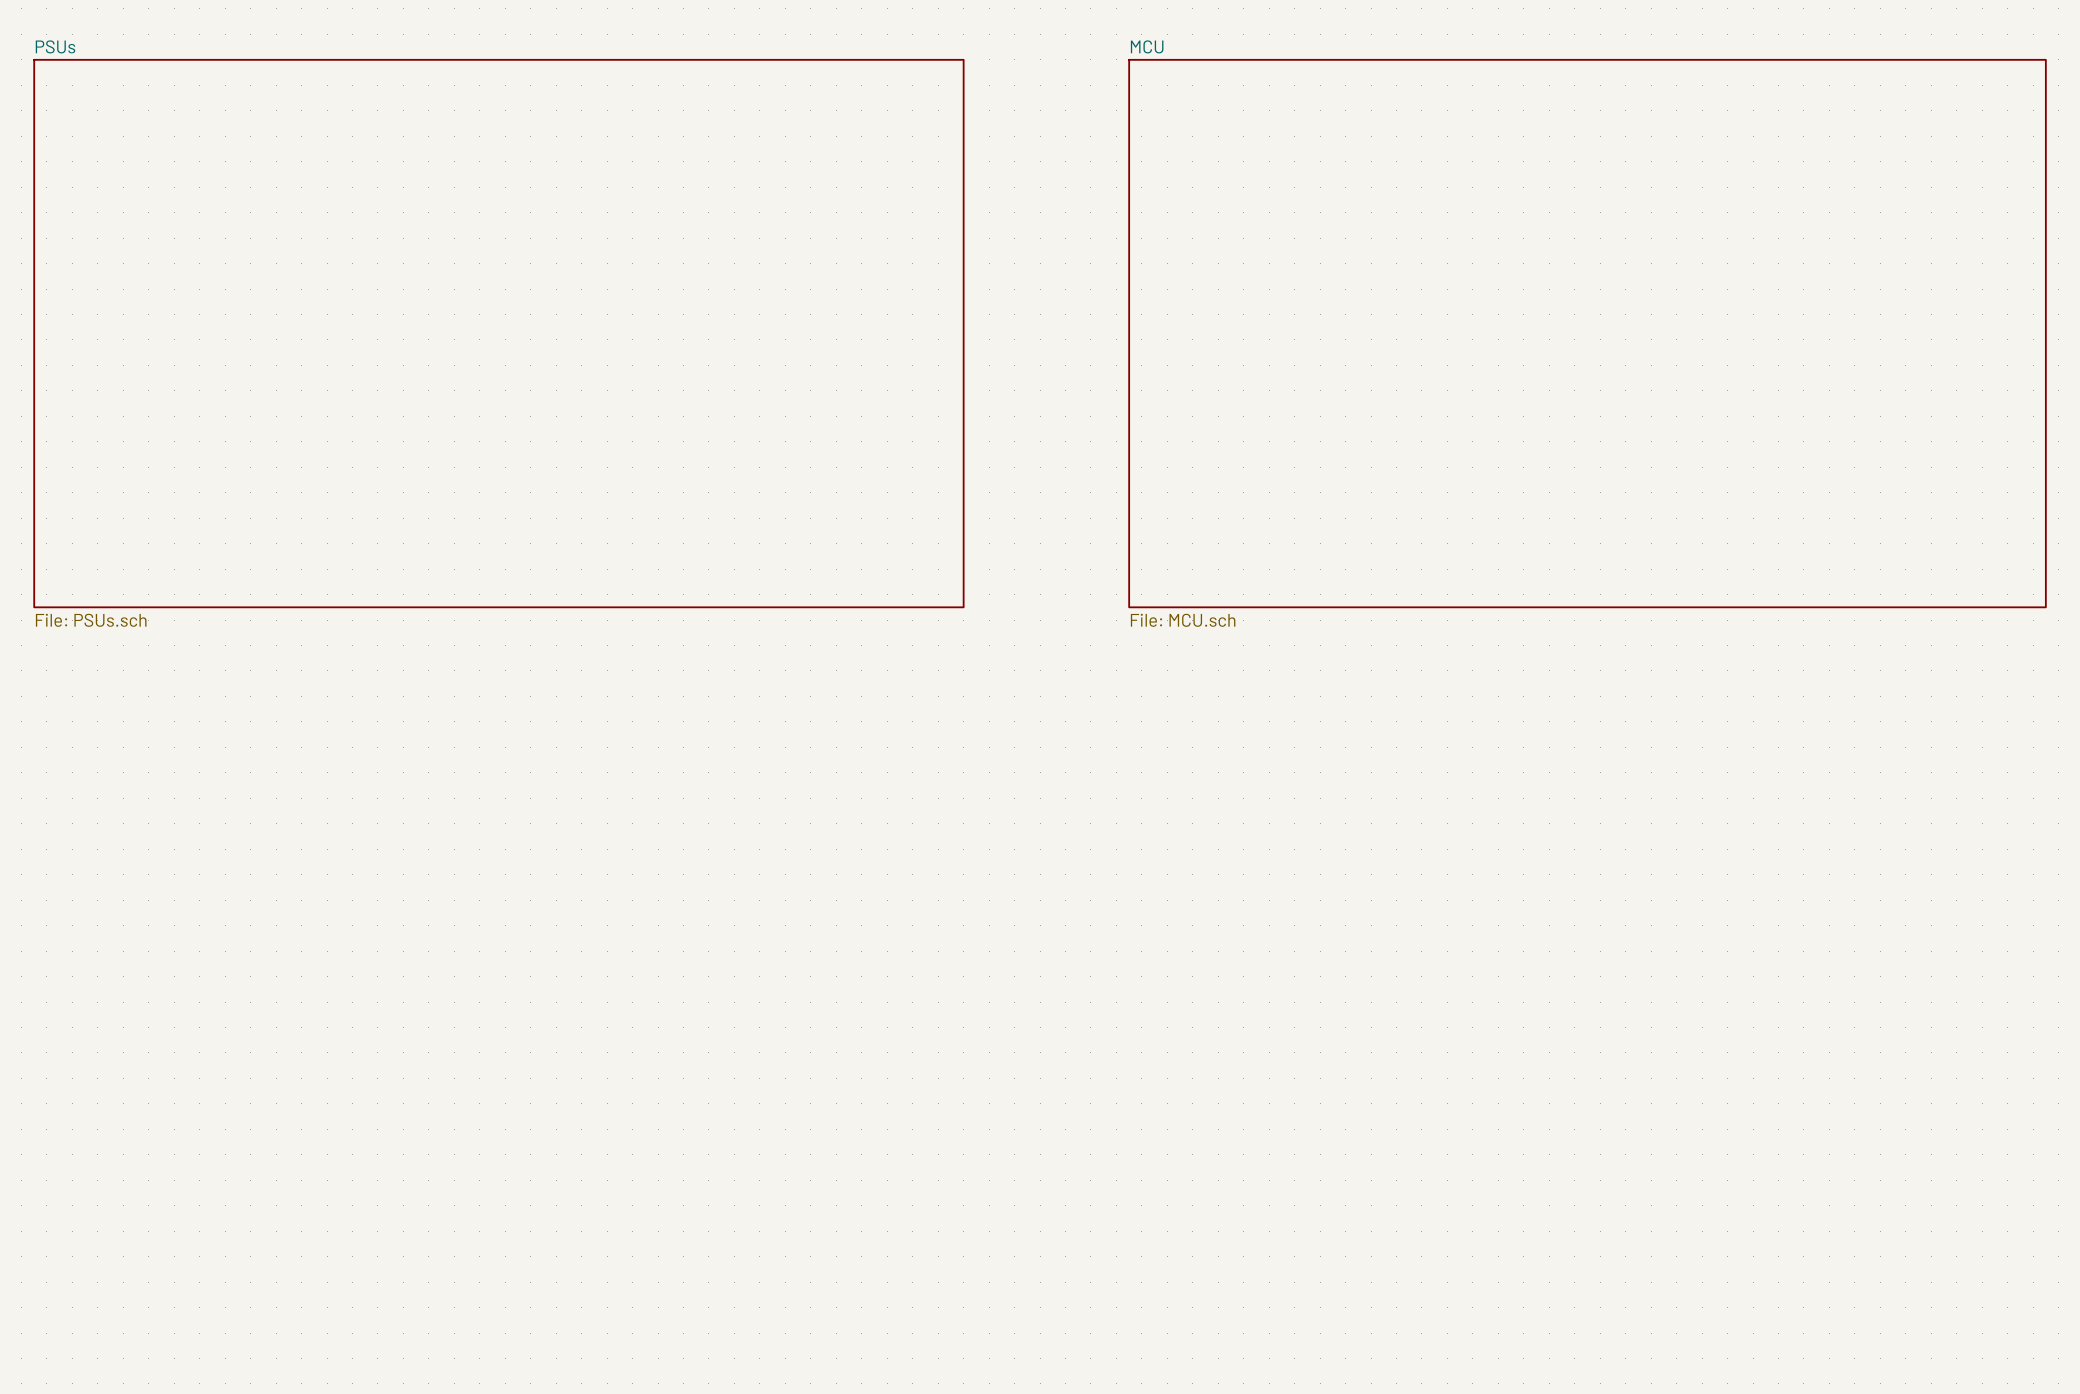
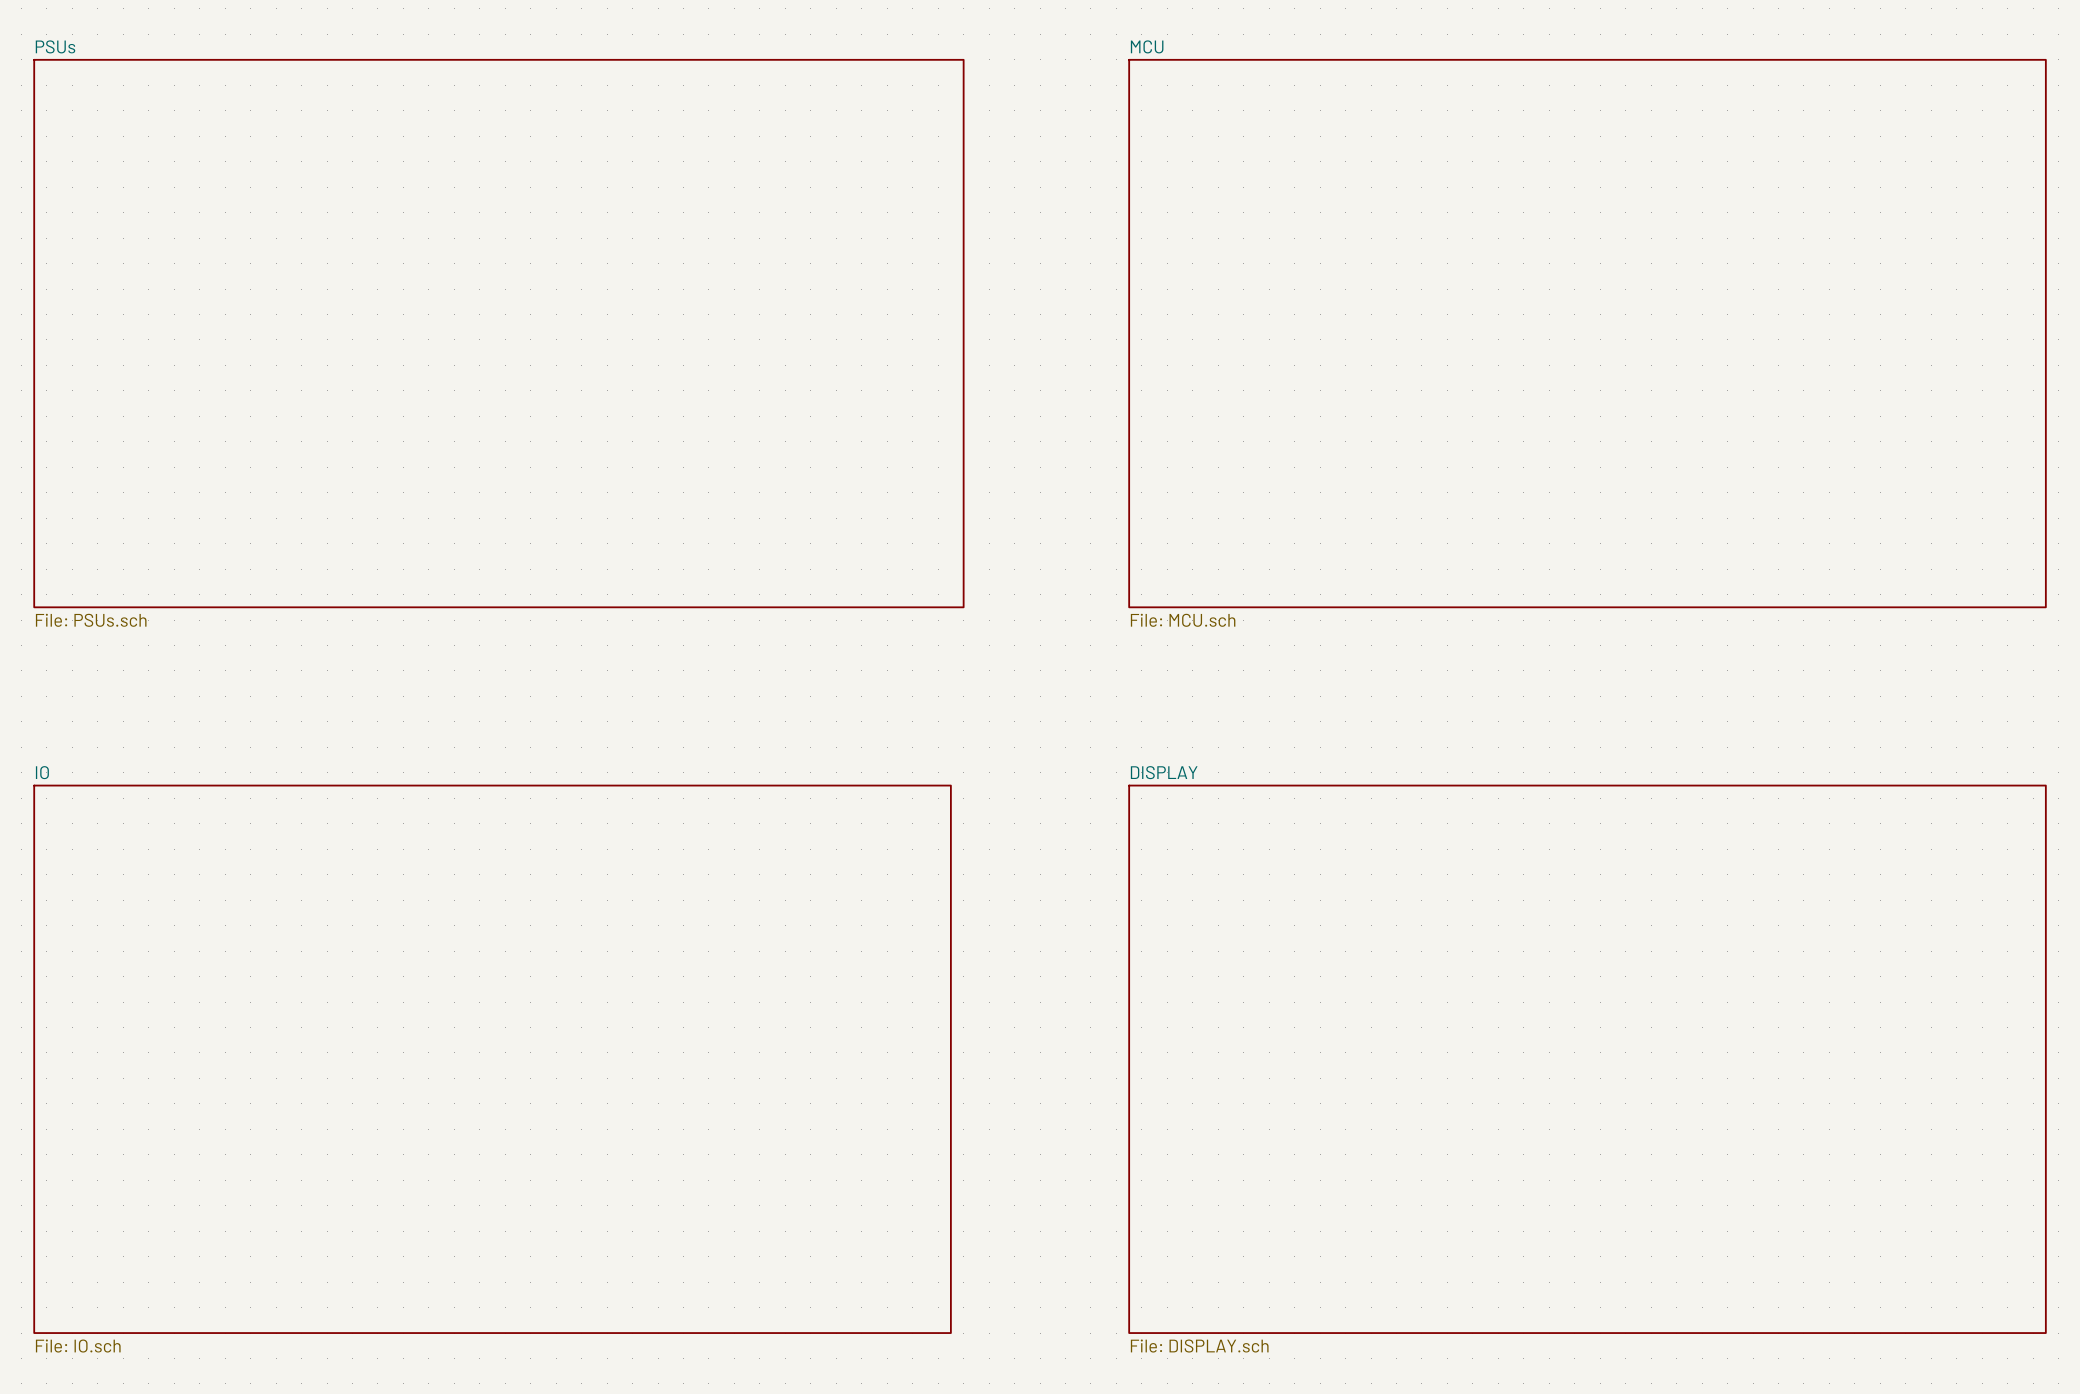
sheet IO: none -> File: IO.sch (492, 1059)
sheet DISPLAY: none -> File: DISPLAY.sch (1587, 1059)

